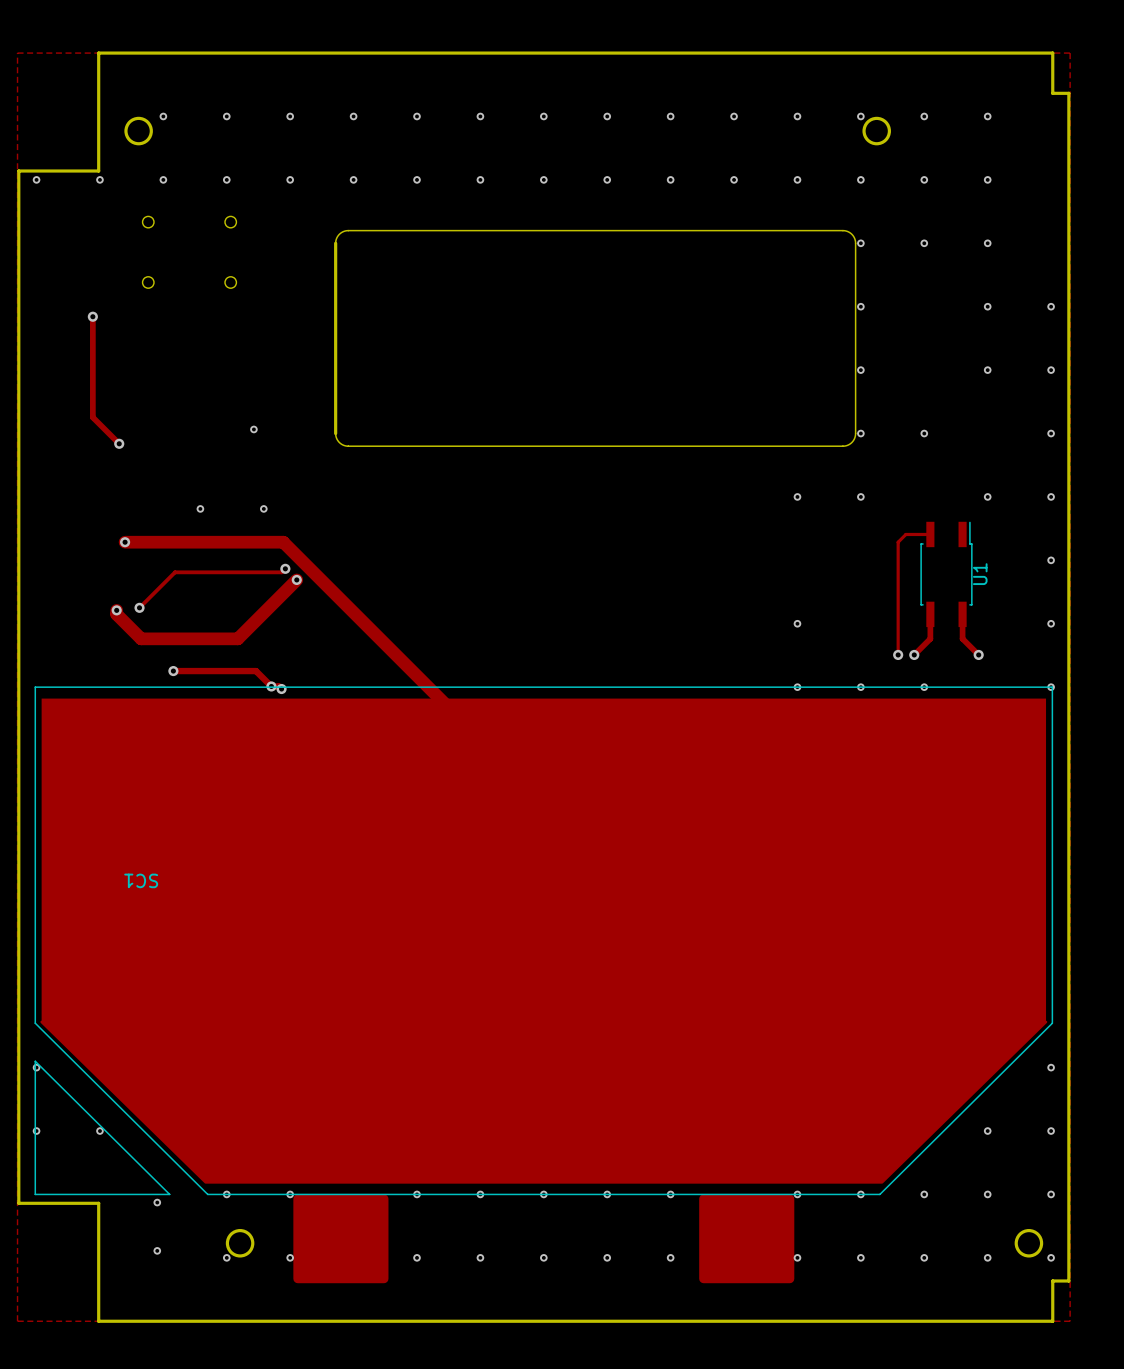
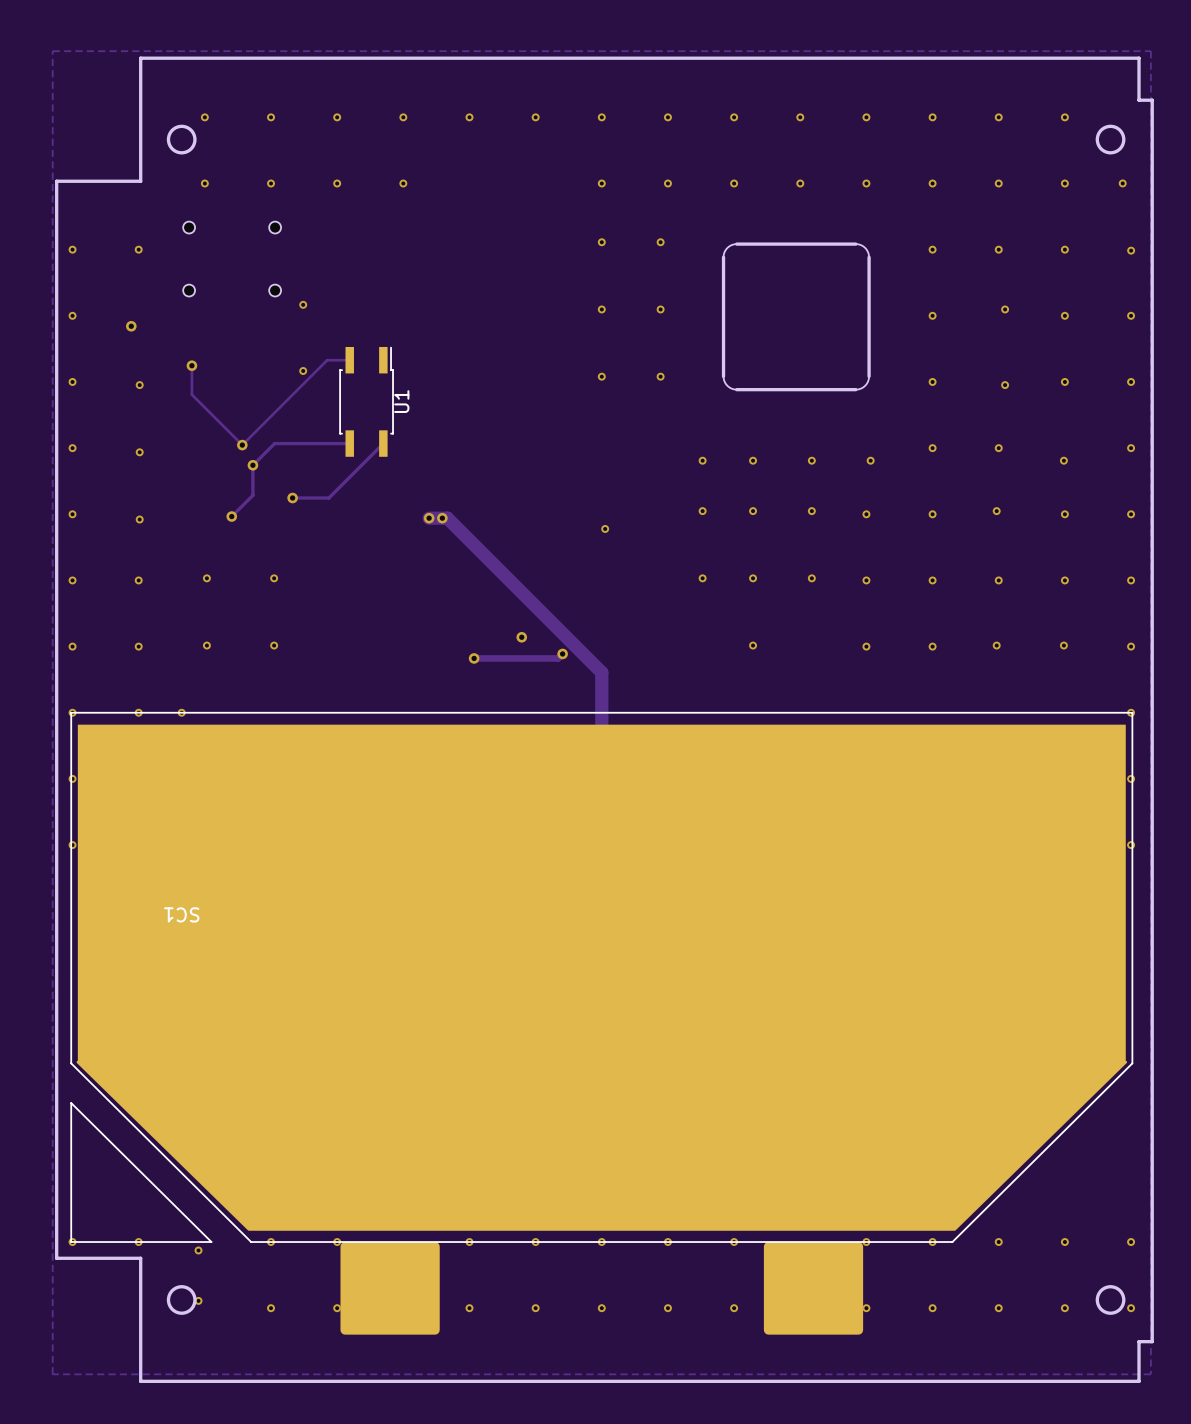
drawing shape: [17, 51, 1071, 1323] -> [55, 56, 1154, 1383]
via: (36, 179) -> none
via: (99, 179) -> none
via: (417, 179) -> none
via: (480, 179) -> none
via: none -> (1122, 183)
via: none -> (601, 242)
via: none -> (660, 242)
via: none -> (72, 249)
via: none -> (138, 249)
via: none -> (1131, 250)
via: none -> (303, 304)
via: none -> (601, 309)
via: none -> (660, 309)
via: none -> (1005, 309)
via: none -> (72, 315)
track: (92, 316) (92, 417) (119, 443) -> none
track: none -> (349, 360) (327, 360) (242, 445) (191, 394) (191, 365)
via: none -> (191, 365)
via: none -> (303, 370)
via: none -> (601, 376)
via: none -> (660, 376)
via: none -> (72, 381)
via: none -> (139, 385)
via: none -> (1005, 385)
via: (253, 429) -> none
track: none -> (349, 443) (274, 443) (252, 465) (252, 495)
track: none -> (383, 443) (328, 498) (292, 498)
via: none -> (242, 445)
via: none -> (72, 448)
via: none -> (139, 452)
via: (119, 443) -> none
via: none -> (702, 460)
via: none -> (753, 460)
via: none -> (811, 460)
via: none -> (870, 460)
via: none -> (1063, 460)
via: none -> (252, 465)
track: none -> (252, 495) (231, 516)
via: none -> (292, 498)
via: none -> (702, 511)
via: none -> (753, 511)
via: none -> (811, 511)
via: none -> (996, 511)
via: none -> (72, 514)
via: none -> (231, 516)
via: none -> (429, 518)
via: none -> (442, 518)
via: none -> (139, 519)
via: (200, 508) -> none
via: (263, 508) -> none
via: none -> (605, 528)
track: (930, 534) (905, 534) (898, 542) (898, 654) -> none
track: (125, 542) (283, 542) (543, 802) -> (429, 518) (447, 518) (601, 672) (601, 833)
via: (125, 542) -> none
via: none -> (206, 578)
via: none -> (274, 578)
via: none -> (702, 578)
via: none -> (753, 578)
via: none -> (811, 578)
via: none -> (72, 580)
via: none -> (138, 580)
via: none -> (866, 580)
via: none -> (932, 580)
via: none -> (998, 580)
via: none -> (1064, 580)
track: (285, 568) (281, 572) (175, 572) (139, 607) -> none
via: (285, 568) -> none
U1 position: (946, 574) -> (366, 401)
track: (296, 579) (237, 638) (141, 638) (116, 614) (116, 610) -> none
via: (296, 579) -> none
via: (139, 607) -> none
via: (116, 610) -> none
via: none -> (521, 637)
track: (930, 614) (930, 638) (914, 654) -> none
track: (962, 614) (962, 638) (978, 654) -> none
via: none -> (206, 645)
via: none -> (274, 645)
via: none -> (753, 645)
via: none -> (996, 645)
via: none -> (1063, 645)
via: none -> (72, 646)
via: none -> (138, 646)
via: none -> (932, 646)
track: none -> (562, 653) (558, 658) (474, 658)
via: none -> (562, 653)
via: none -> (474, 658)
via: (898, 654) -> none
via: (914, 654) -> none
via: (978, 654) -> none
track: (173, 671) (256, 671) (271, 686) (279, 686) (281, 689) -> none
via: (173, 671) -> none
via: (271, 686) -> none
via: none -> (72, 712)
via: none -> (138, 712)
via: none -> (181, 712)
via: (797, 687) -> none
via: (860, 687) -> none
via: (924, 687) -> none
via: (281, 689) -> none
via: none -> (72, 778)
via: none -> (1131, 778)
via: none -> (72, 845)
via: none -> (1131, 845)
via: (36, 1067) -> none
via: (1051, 1067) -> none
via: (36, 1131) -> none
via: (99, 1131) -> none
via: (987, 1131) -> none
via: (1051, 1131) -> none
via: none -> (72, 1242)
via: none -> (138, 1242)

